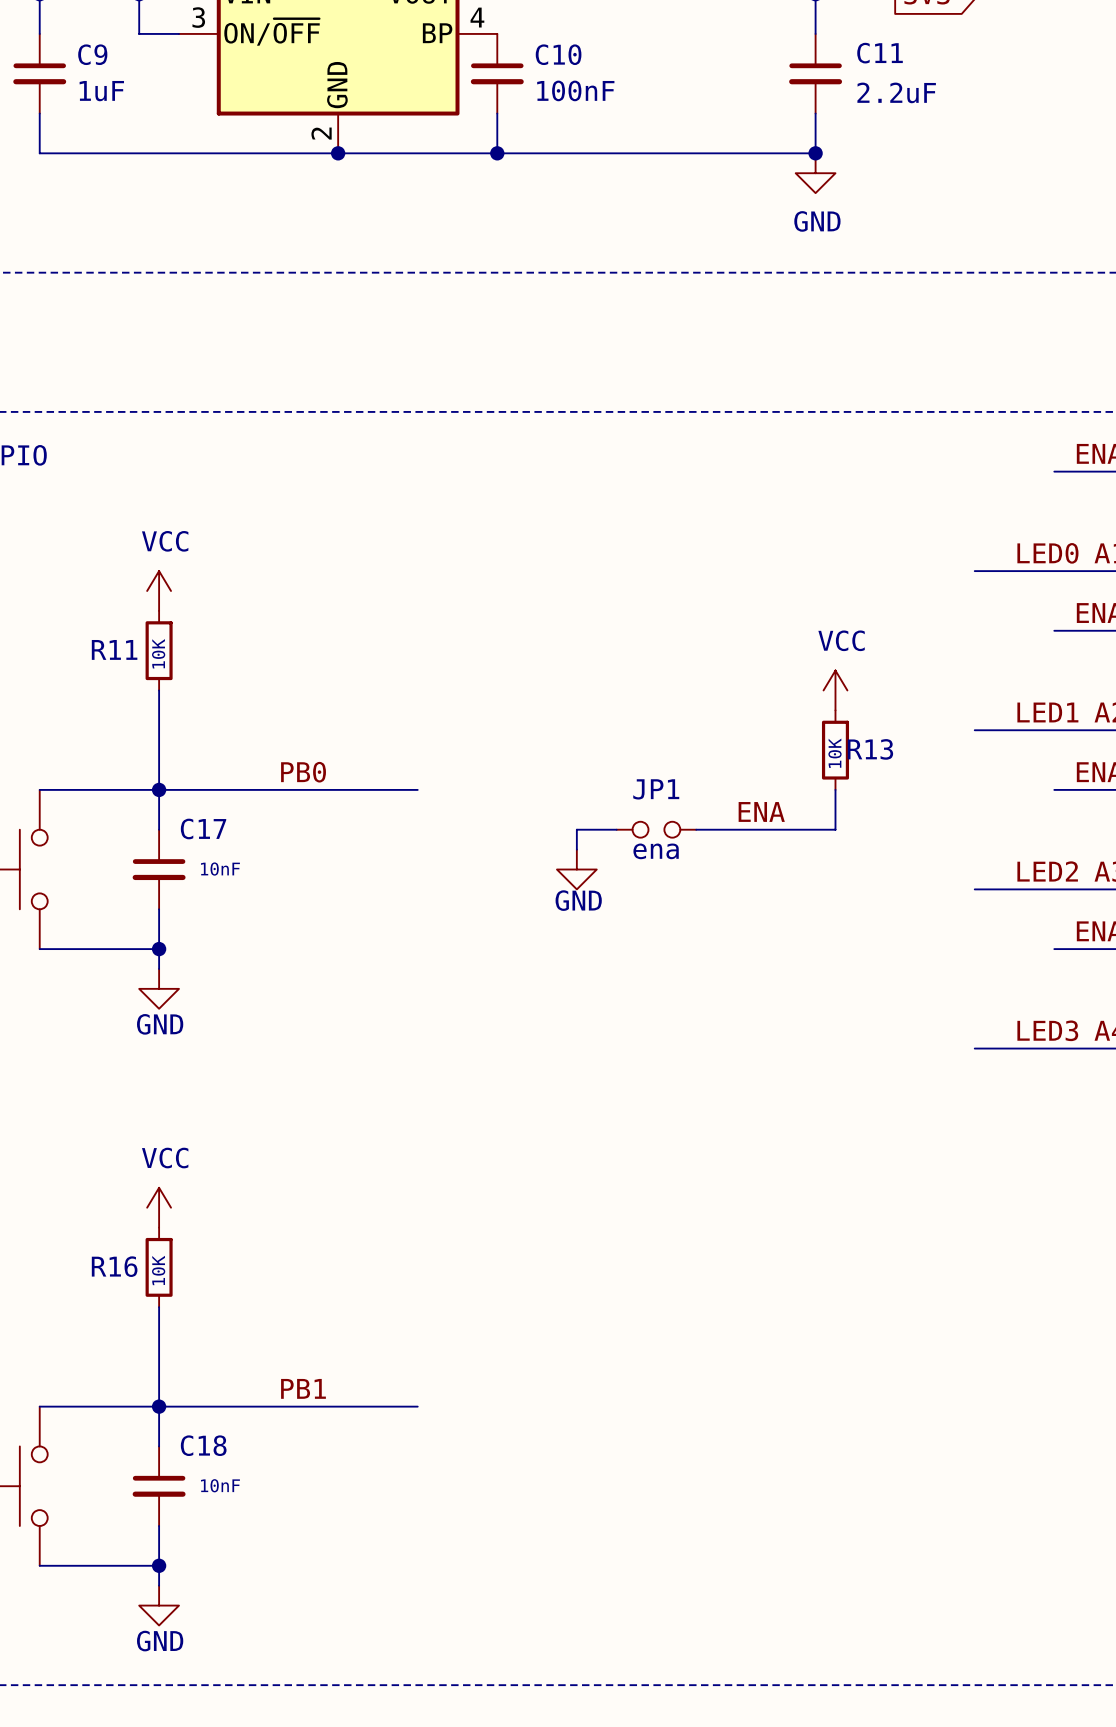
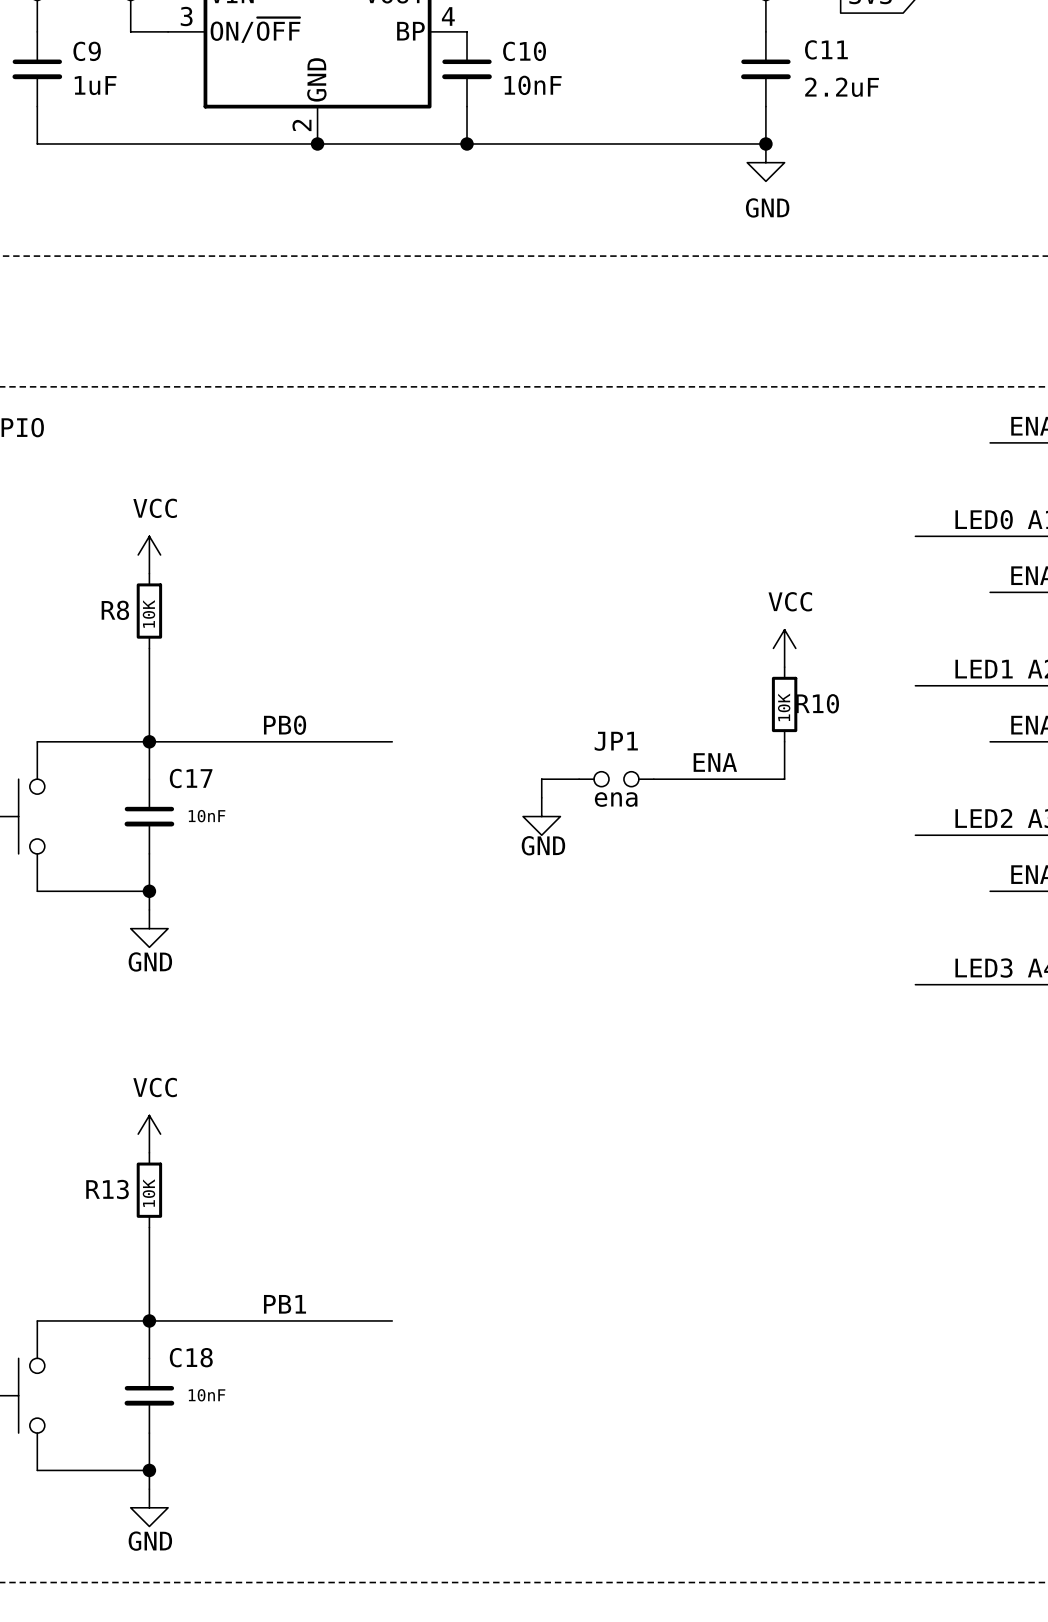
C10 value: 100nF (575, 90) -> 10nF (533, 85)
R11 name: R11 (114, 649) -> R8 (115, 610)
R13 name: R13 (870, 749) -> R10 (817, 703)
R16 name: R16 (114, 1266) -> R13 (107, 1189)

